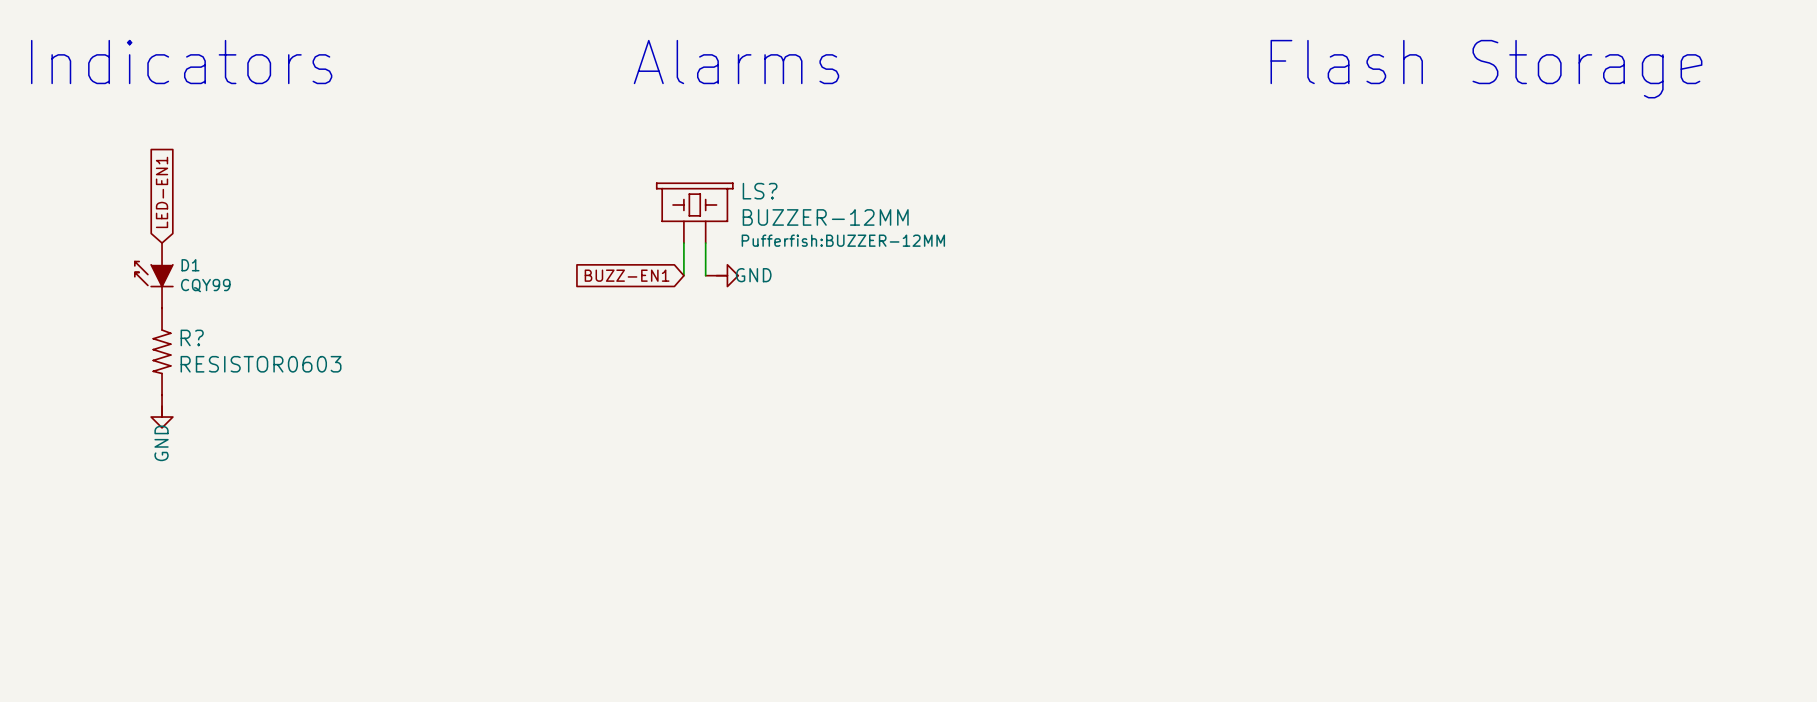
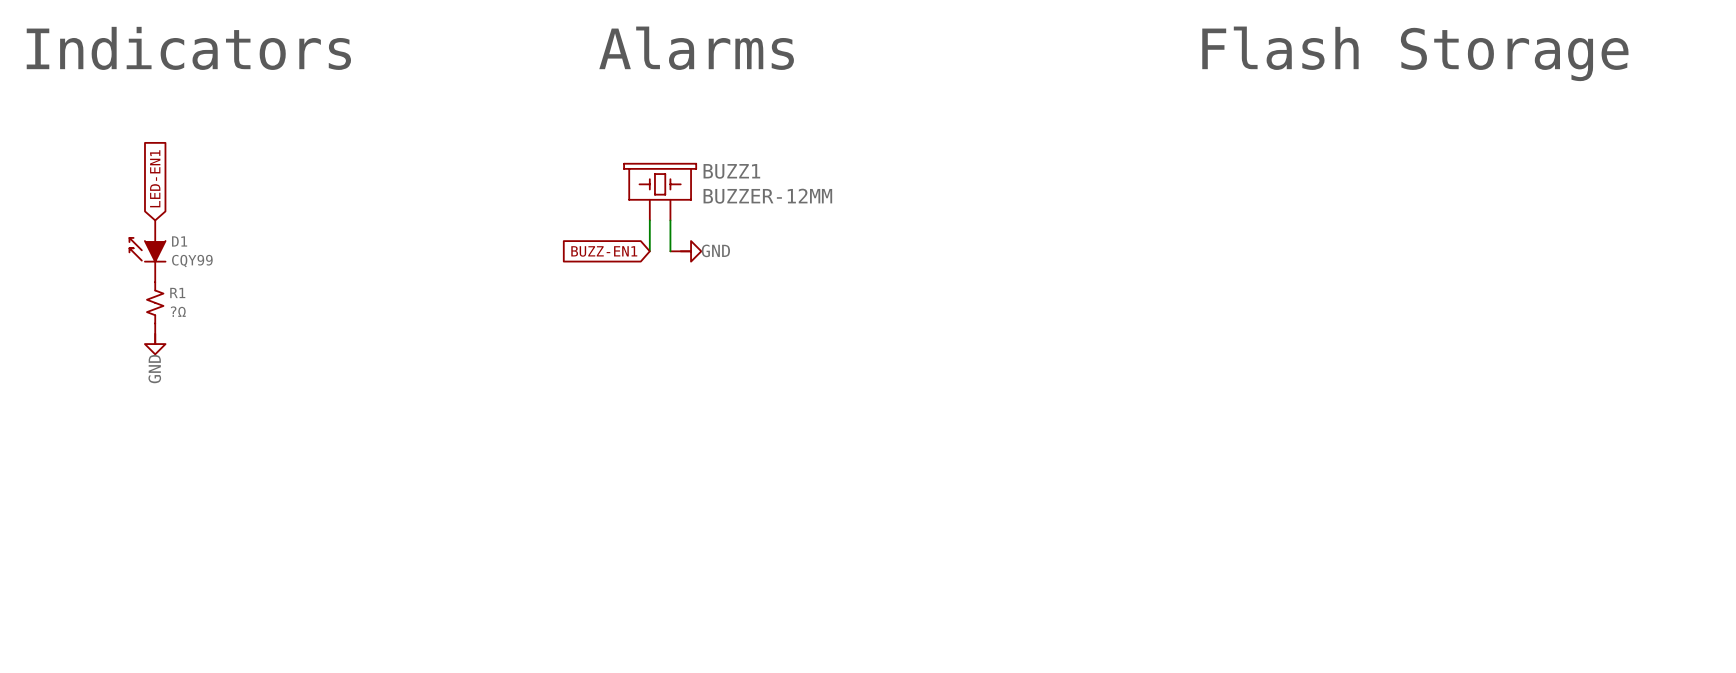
LS? name: LS? (760, 191) -> BUZZ1 (731, 171)
LS? text: Pufferfish:BUZZER-12MM (843, 240) -> none
R1: none -> (155, 302)
R?: RESISTOR0603 (162, 351) -> none
power symbol position: GND (162, 411) -> GND (155, 338)

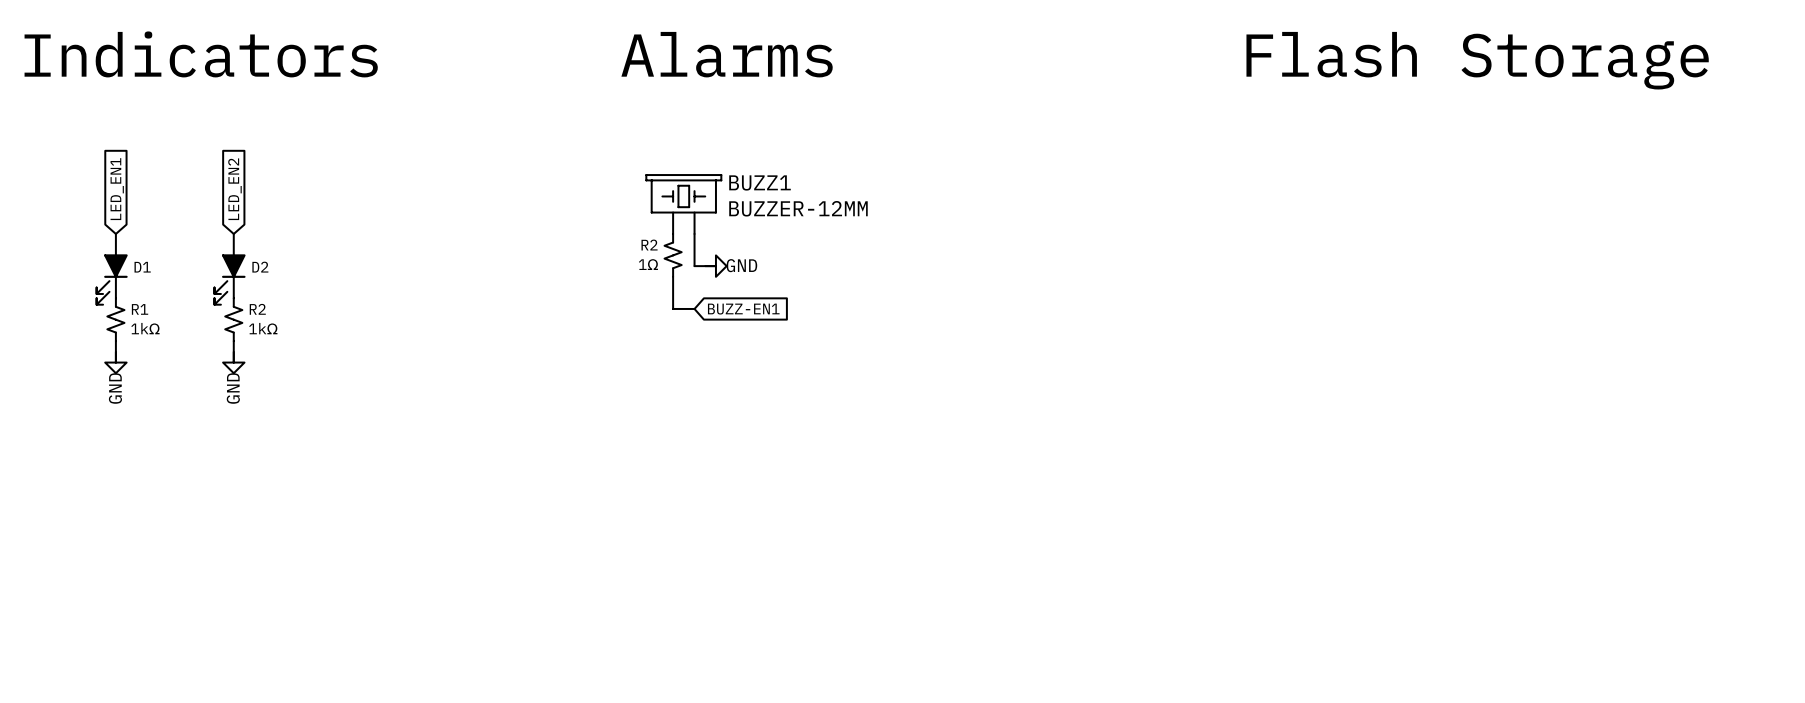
global label: none -> LED_EN1 (117, 189)
global label: LED-EN1 (155, 178) -> none
global label: none -> LED_EN2 (234, 189)
D1 symbol: [129, 220, 167, 283] -> [96, 233, 128, 305]
wire: (649, 220) (649, 251) -> none
R2: none -> (673, 255)
global label rotation: 0° (604, 251) -> 180° (743, 309)
global label position: BUZZ-EN1 (604, 251) -> BUZZ-EN1 (743, 309)
D2: none -> (230, 269)
D1 value: CQY99 (192, 261) -> none
wire: none -> (673, 276) (673, 308) (694, 308)
R1 position: (155, 302) -> (115, 319)
R2: none -> (233, 319)
R1 text: ?Ω (178, 311) -> 1kΩ (145, 328)
power symbol: none -> GND (115, 357)
power symbol: GND (155, 338) -> none
power symbol: none -> GND (233, 357)

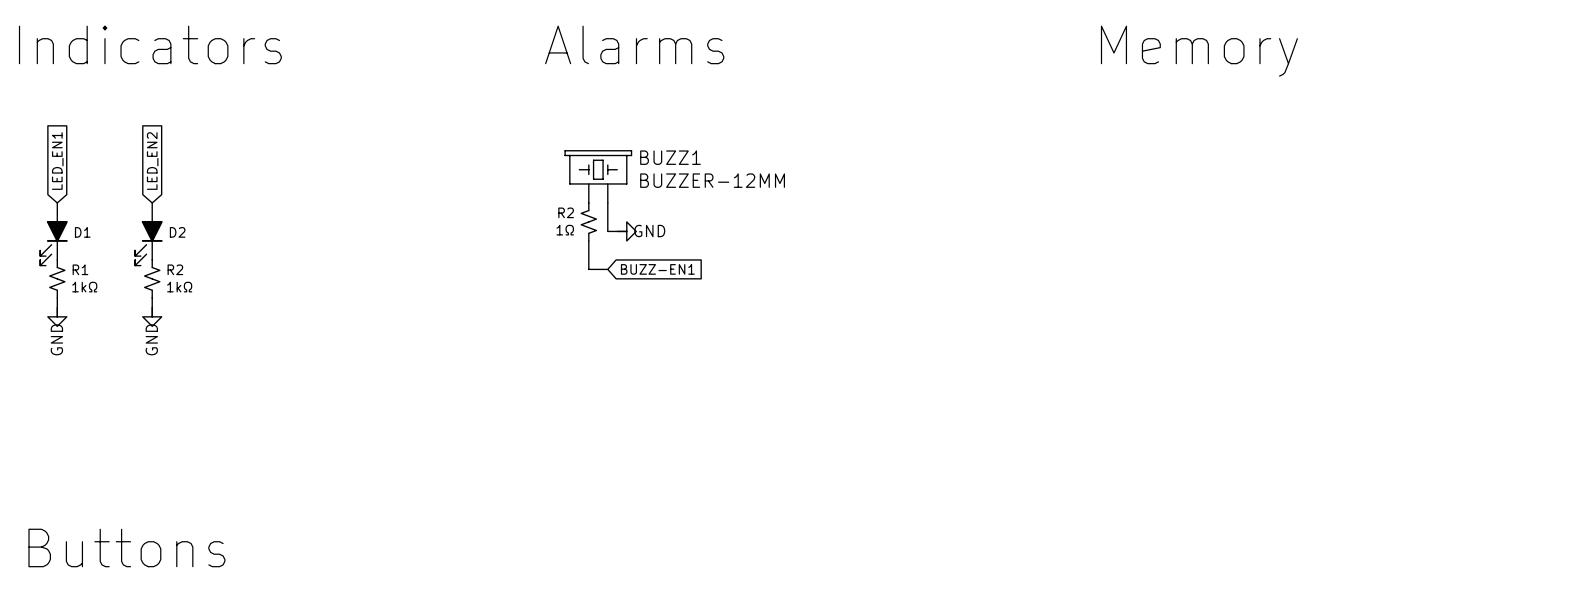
text: Flash Storage (1477, 60) -> Memory (1199, 51)
global label position: LED_EN1 (117, 189) -> LED_EN1 (57, 161)
global label position: LED_EN2 (234, 189) -> LED_EN2 (152, 161)
D1 position: (112, 269) -> (53, 234)
D2 position: (230, 269) -> (148, 234)
R1 position: (115, 319) -> (57, 278)
R2 position: (233, 319) -> (152, 278)
power symbol: none -> GND (57, 312)
power symbol: GND (115, 357) -> none
power symbol: none -> GND (152, 312)
power symbol: GND (233, 357) -> none
text: none -> Buttons (126, 547)

